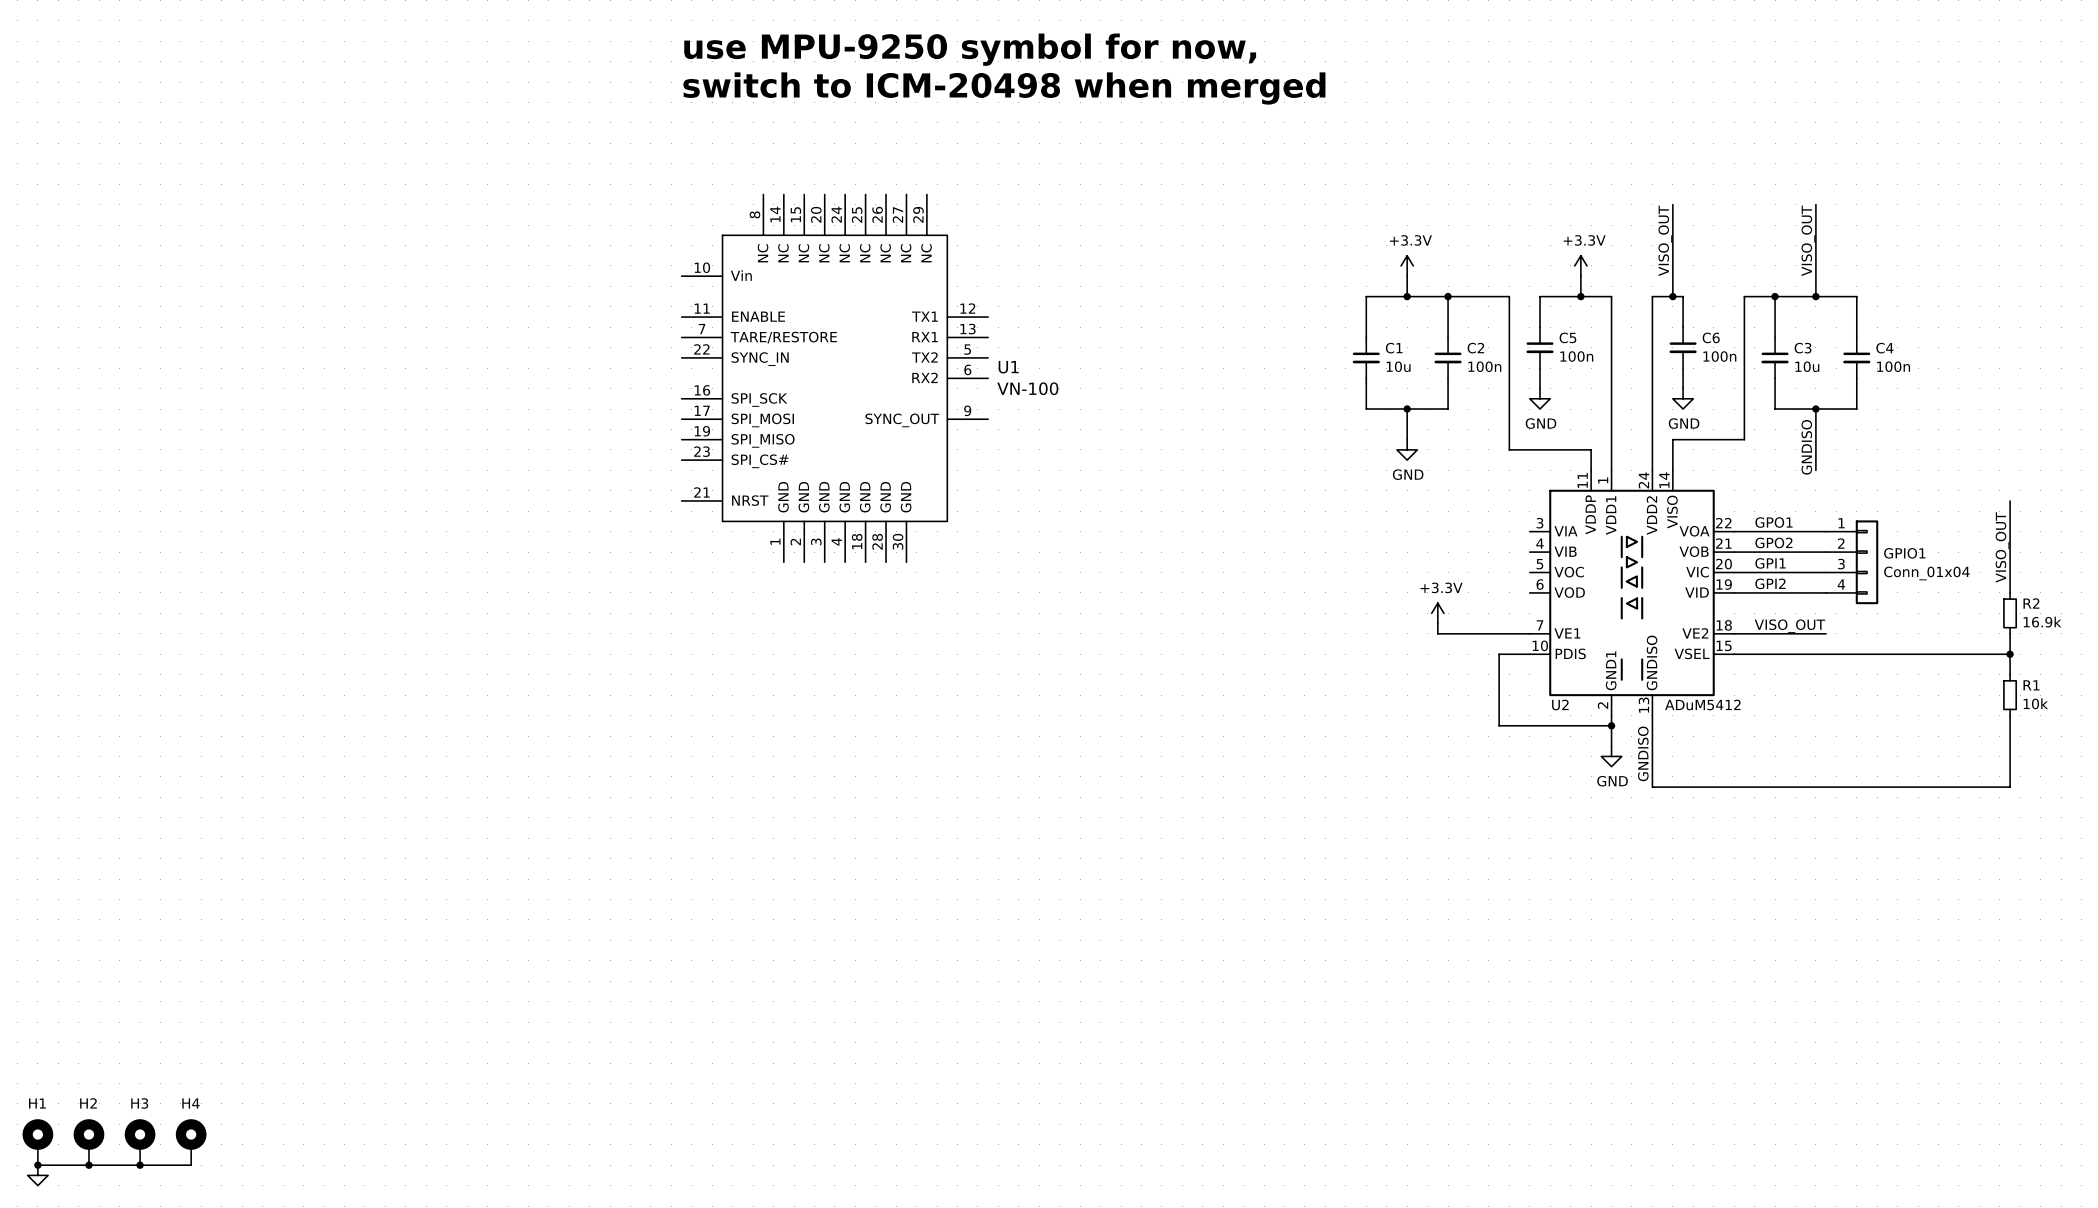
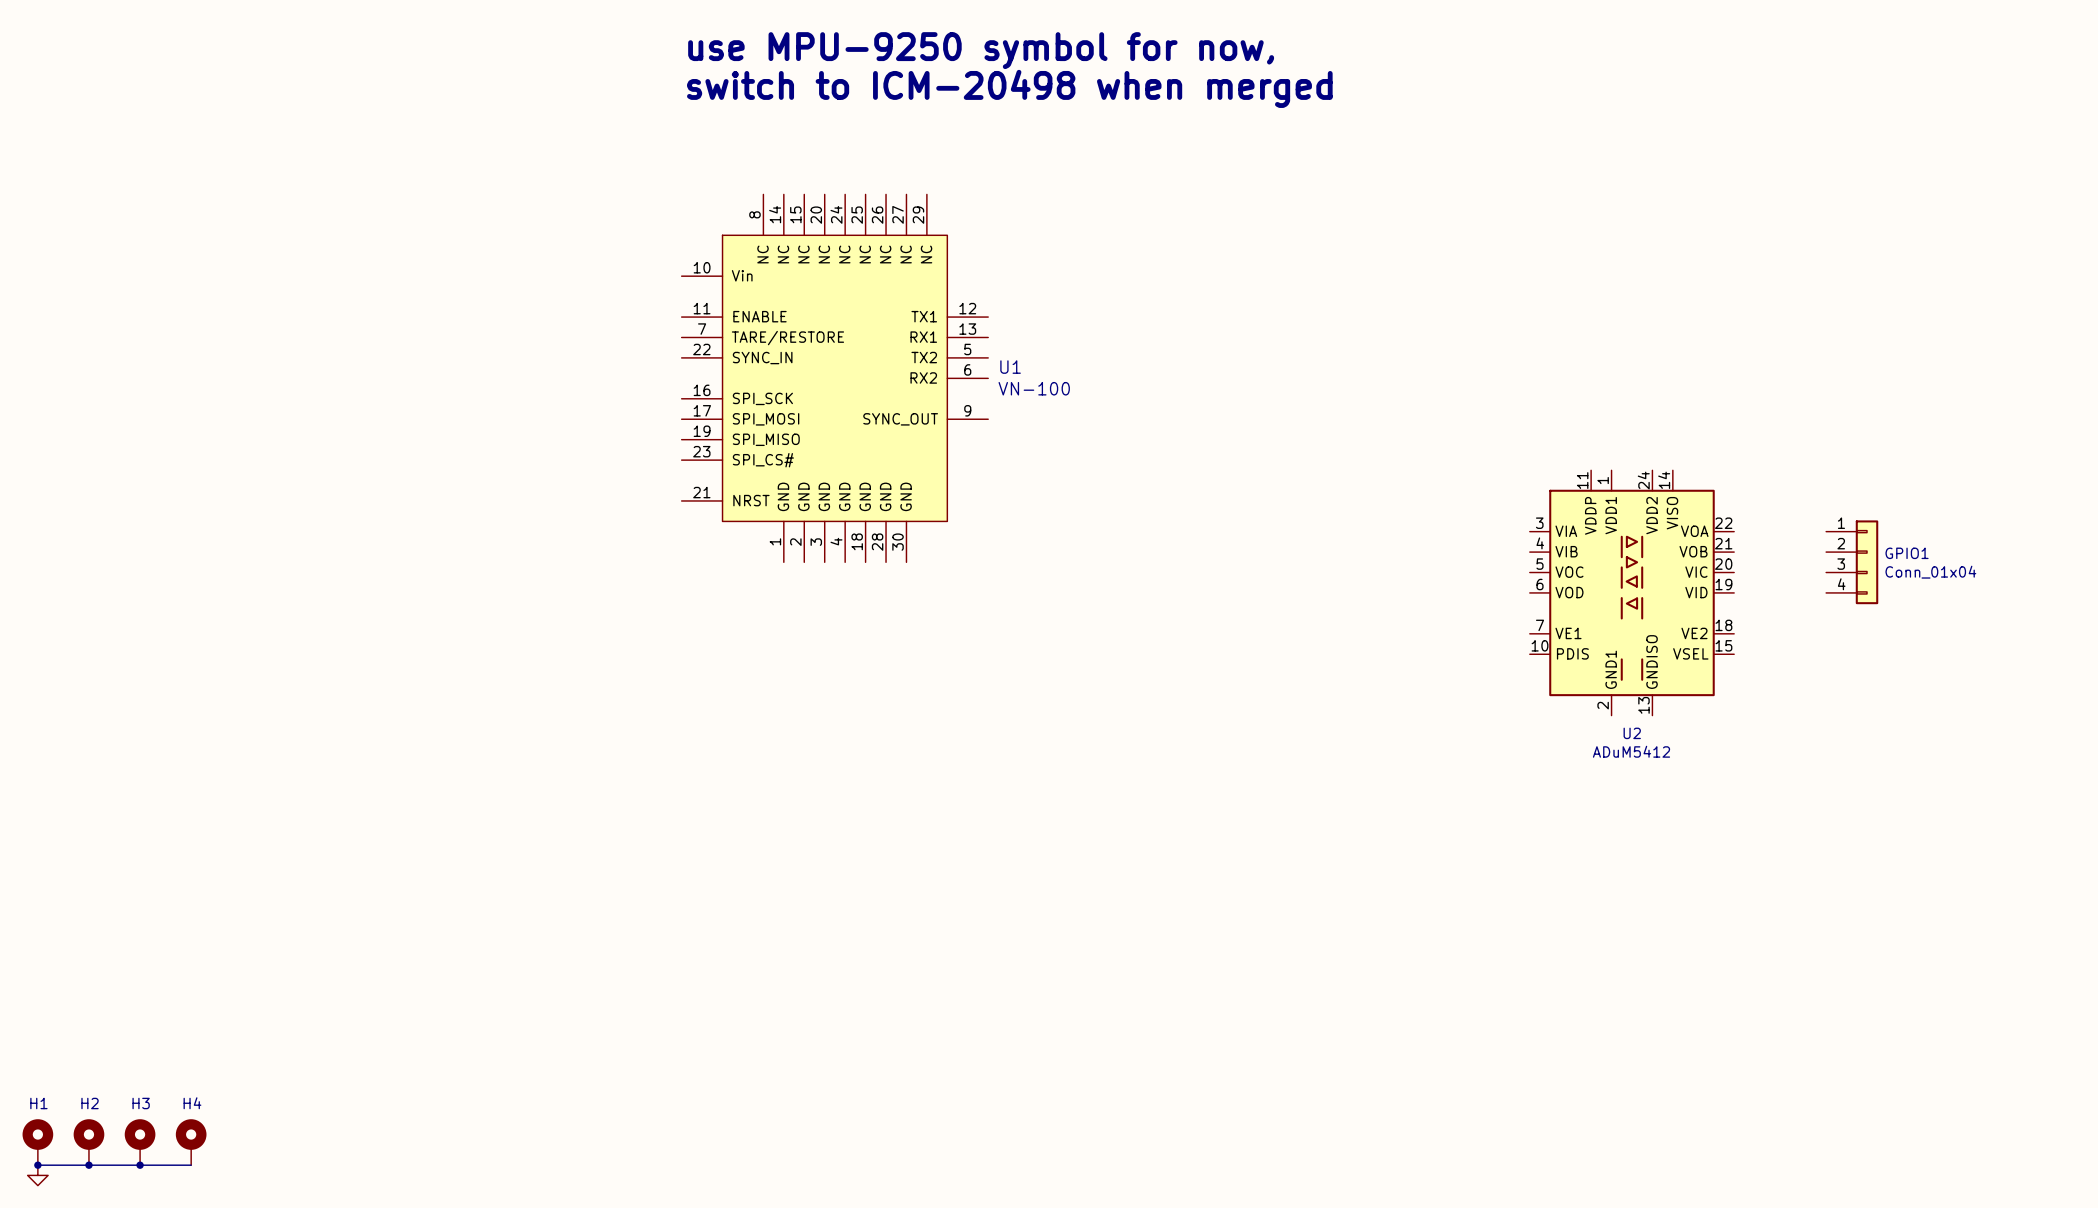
wire: (1672, 204) (1672, 296) -> none
wire: (1815, 204) (1815, 296) -> none
label: VISO_OUT (1665, 240) -> none
label: VISO_OUT (1808, 240) -> none
power symbol: +3.3V (1407, 265) -> none
power symbol: +3.3V (1580, 265) -> none
wire: (1407, 276) (1407, 296) -> none
wire: (1580, 276) (1580, 296) -> none
junction: (1407, 296) -> none
wire: (1448, 296) (1448, 337) -> none
junction: (1448, 296) -> none
junction: (1580, 296) -> none
junction: (1672, 296) -> none
wire: (1775, 296) (1775, 337) -> none
junction: (1775, 296) -> none
junction: (1815, 296) -> none
wire: (1540, 327) (1540, 296) (1611, 296) (1611, 470) -> none
wire: (1683, 327) (1683, 296) (1652, 296) (1652, 470) -> none
wire: (1366, 337) (1366, 296) (1509, 296) (1509, 449) (1591, 449) (1591, 470) -> none
wire: (1856, 337) (1856, 296) (1744, 296) (1744, 439) (1672, 439) (1672, 470) -> none
C5: 100n (1540, 347) -> none
C6: 100n (1683, 347) -> none
C1: 10u (1366, 357) -> none
C2: 100n (1448, 357) -> none
C3: 10u (1775, 357) -> none
C4: 100n (1856, 357) -> none
wire: (1540, 368) (1540, 388) -> none
wire: (1683, 368) (1683, 388) -> none
wire: (1366, 378) (1366, 409) (1448, 409) (1448, 378) -> none
wire: (1775, 378) (1775, 409) (1856, 409) (1856, 378) -> none
power symbol: GND (1540, 398) -> none
power symbol: GND (1683, 398) -> none
wire: (1407, 409) (1407, 439) -> none
junction: (1407, 409) -> none
wire: (1815, 409) (1815, 470) -> none
junction: (1815, 409) -> none
label: GNDISO (1806, 447) -> none
power symbol: GND (1407, 449) -> none
wire: (2010, 500) (2010, 592) -> none
label: GPO1 (1773, 522) -> none
wire: (1734, 531) (1826, 531) -> none
label: GPO2 (1773, 542) -> none
label: VISO_OUT (2002, 547) -> none
wire: (1734, 552) (1826, 552) -> none
label: GPI1 (1770, 563) -> none
wire: (1734, 572) (1826, 572) -> none
label: GPI2 (1770, 583) -> none
wire: (1734, 592) (1826, 592) -> none
power symbol: +3.3V (1437, 613) -> none
R2: 16.9k (2010, 613) -> none
wire: (1437, 623) (1437, 633) (1529, 633) -> none
label: VISO_OUT (1789, 626) -> none
wire: (1734, 633) (1826, 633) -> none
wire: (2010, 633) (2010, 674) -> none
wire: (1529, 654) (1499, 654) (1499, 725) (1611, 725) -> none
wire: (1734, 654) (2010, 654) -> none
junction: (2010, 654) -> none
R1: 10k (2010, 695) -> none
U2 name position: U2 (1560, 704) -> U2 (1632, 733)
U2 value position: ADuM5412 (1702, 704) -> ADuM5412 (1631, 751)
wire: (1611, 715) (1611, 746) -> none
wire: (1652, 715) (1652, 787) (2010, 787) (2010, 715) -> none
junction: (1611, 725) -> none
label: GNDISO (1643, 753) -> none
power symbol: GND (1611, 756) -> none

